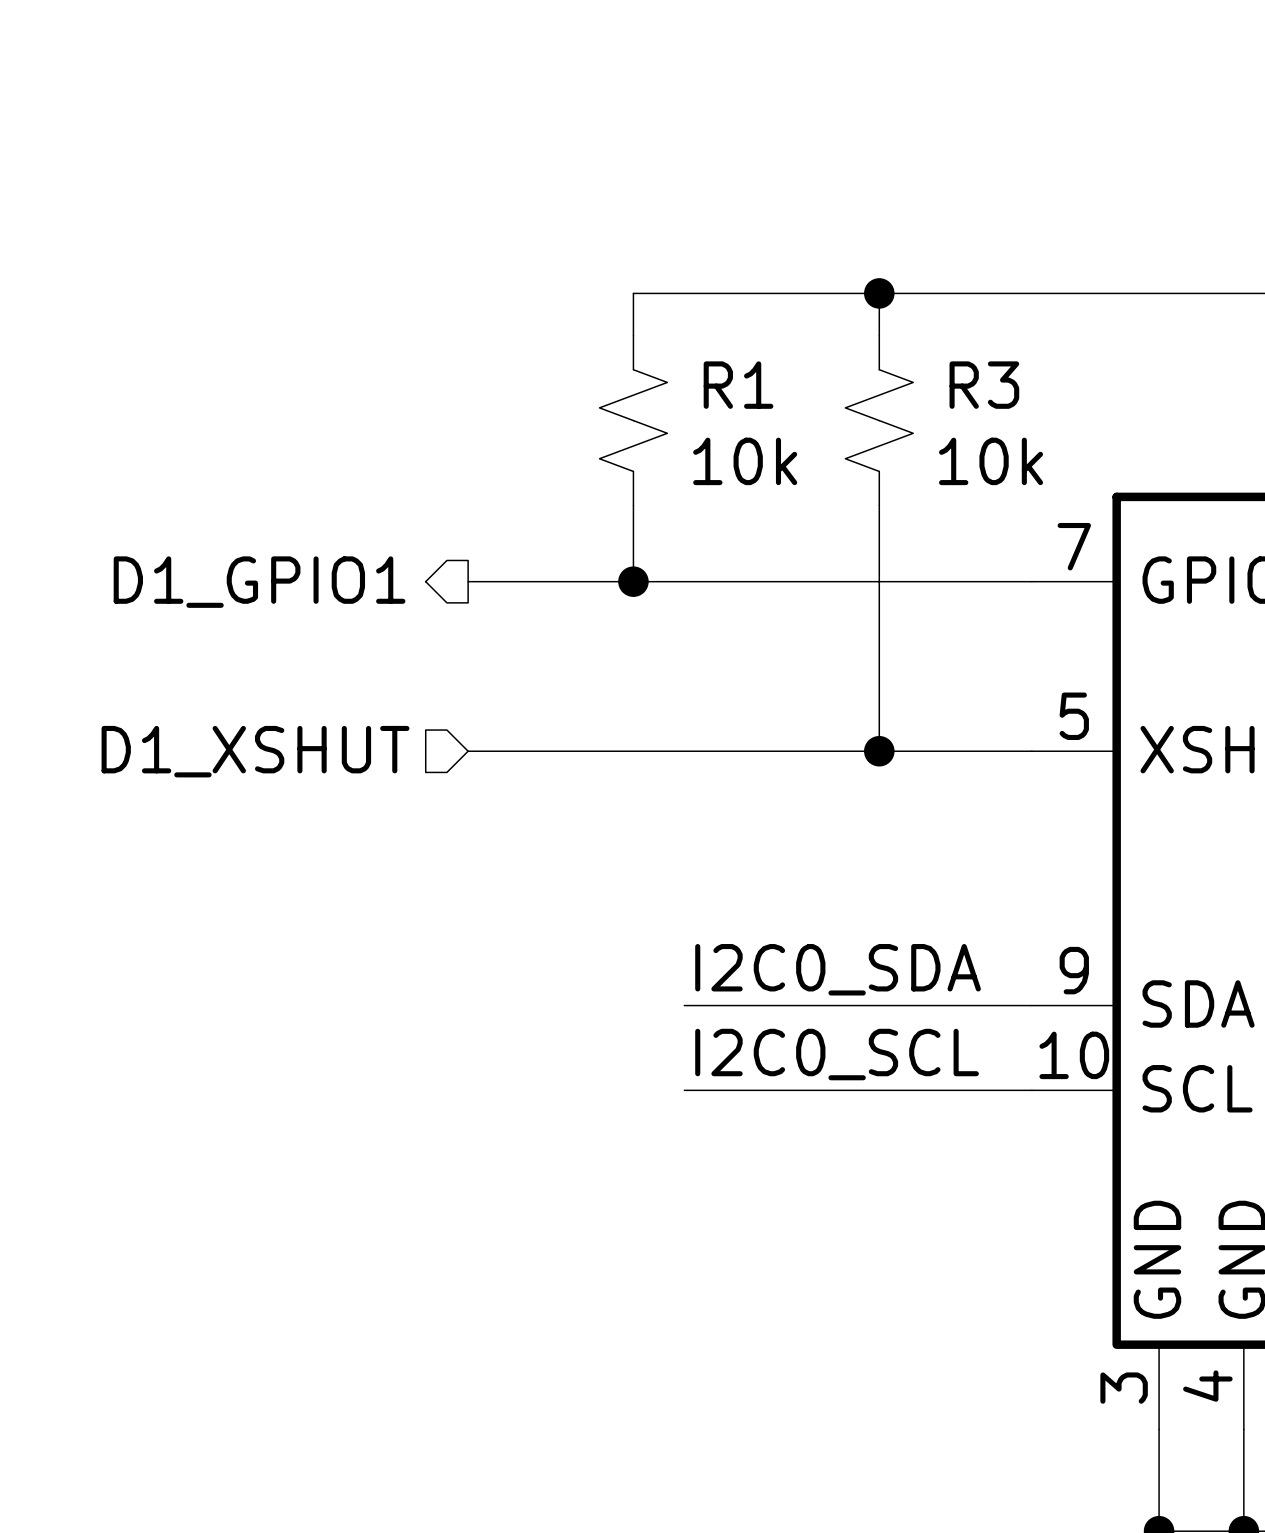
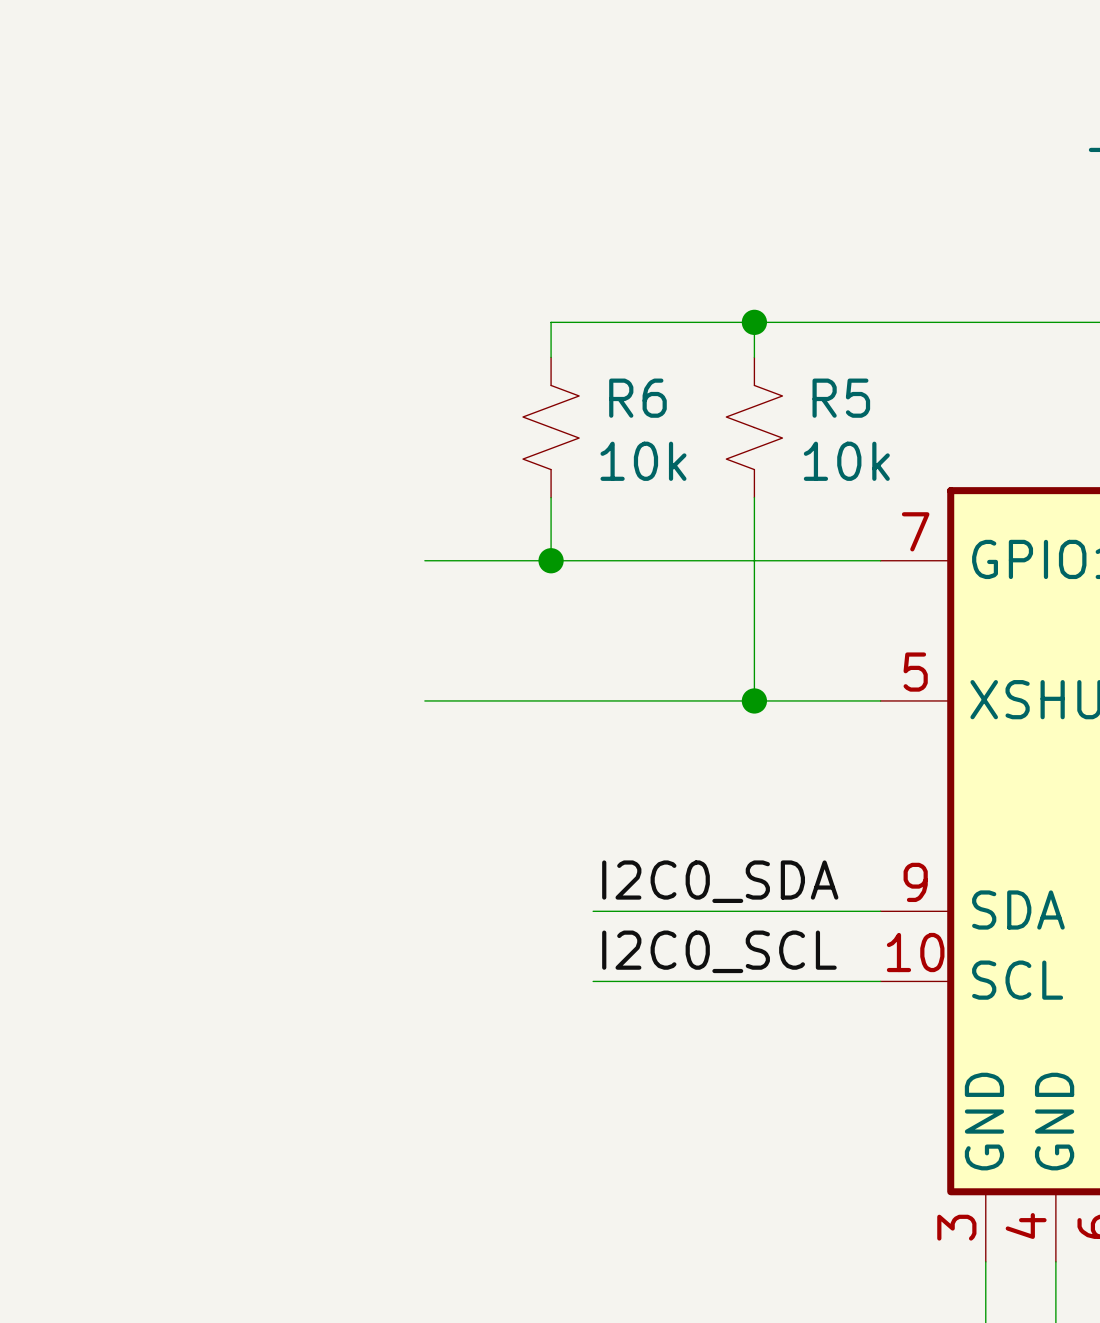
R1 name: R1 (738, 385) -> R6 (637, 398)
R3 name: R3 (984, 385) -> R5 (841, 398)
wire: (468, 581) (480, 581) -> none
hierarchical label: D1_GPIO1 (259, 582) -> none
hierarchical label: D1_XSHUT (255, 751) -> none
wire: (468, 751) (480, 751) -> none

